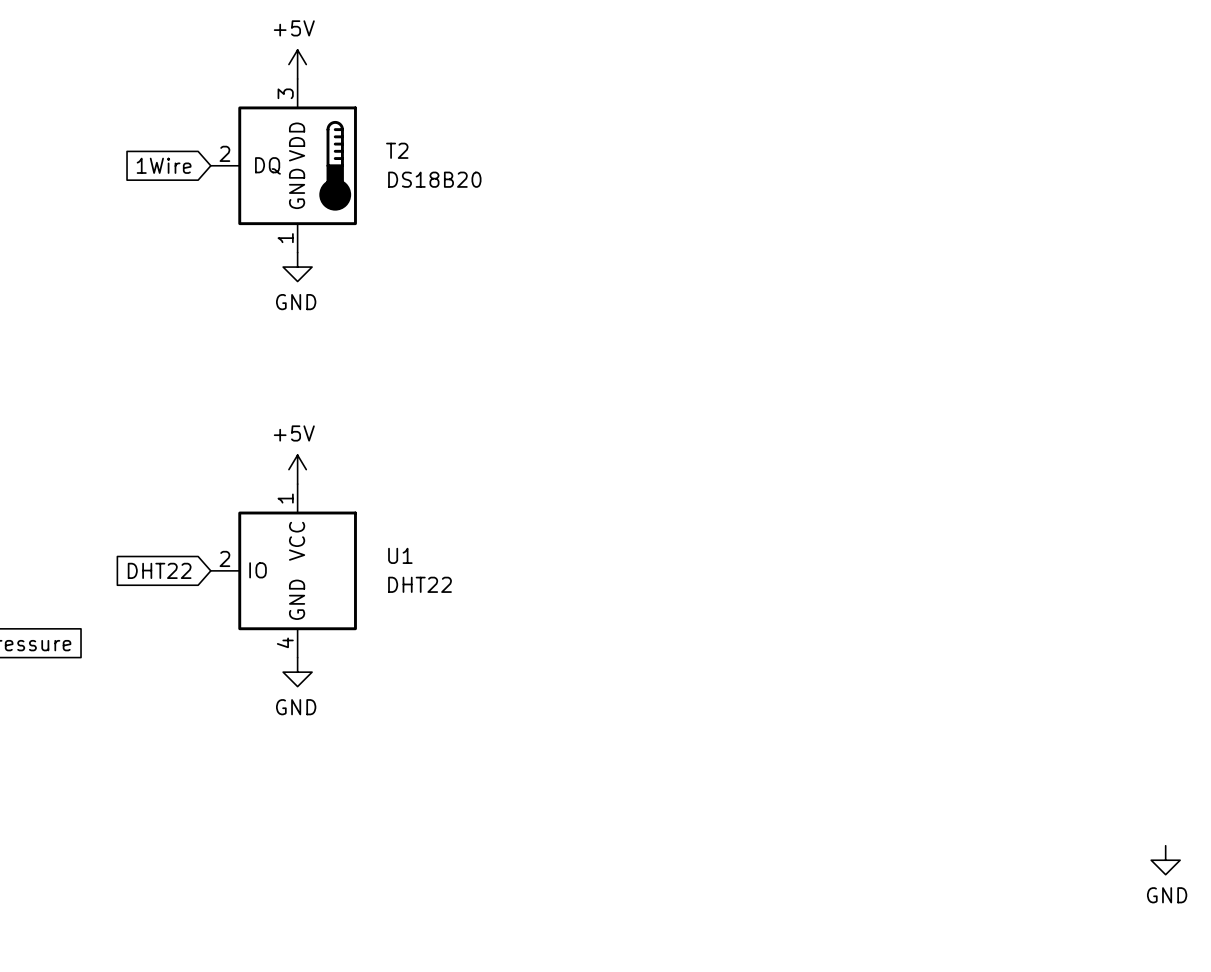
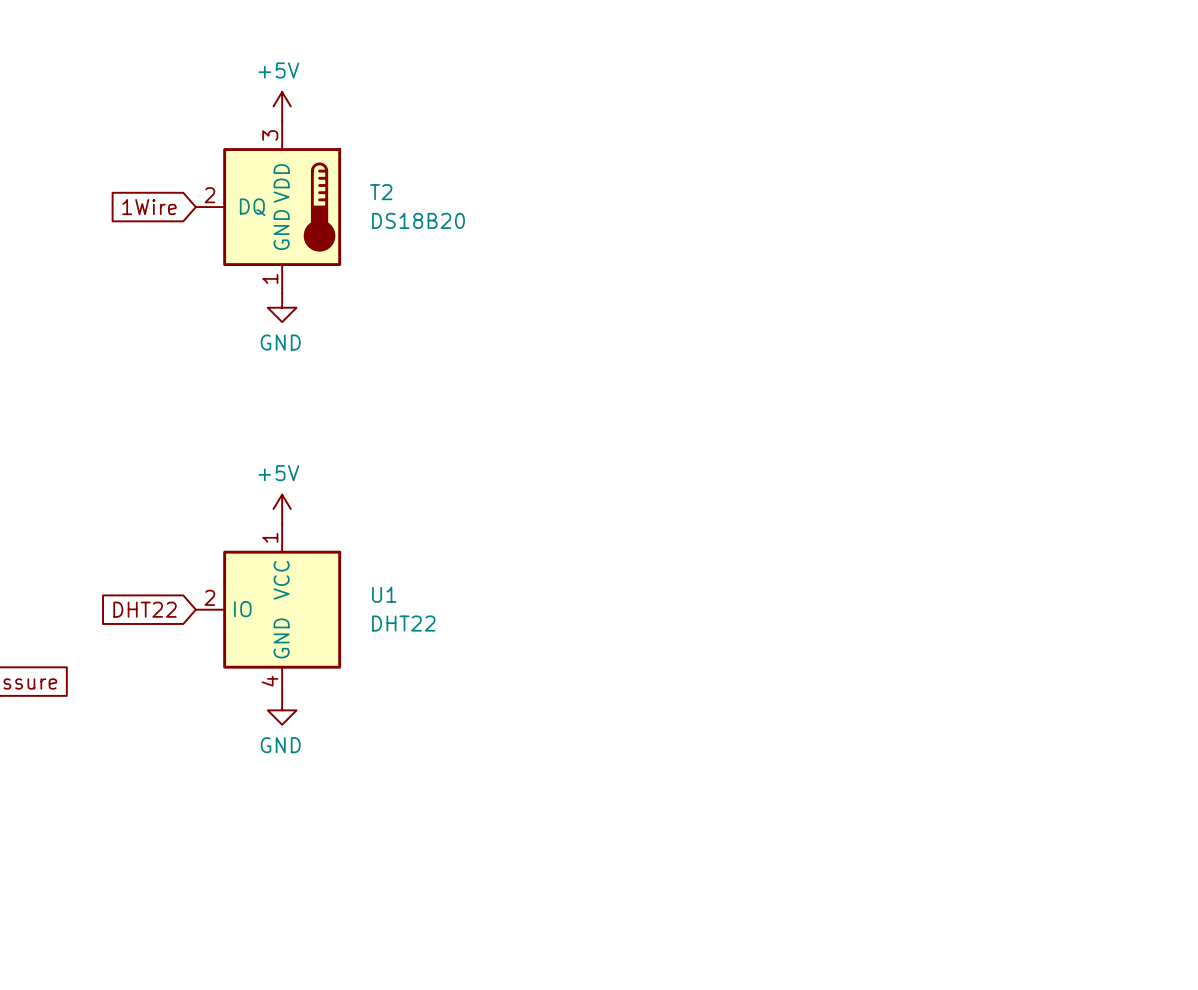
power symbol: GND (1165, 860) -> none

